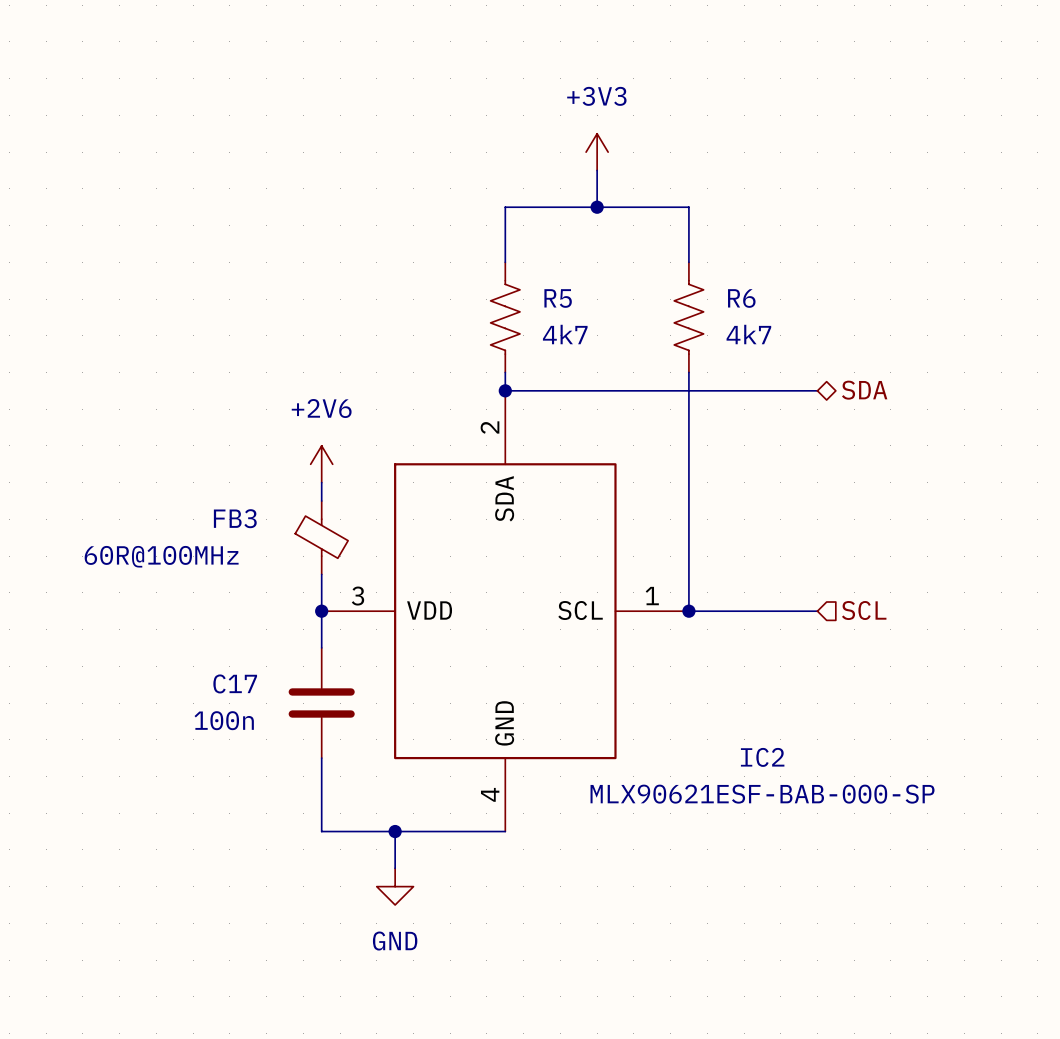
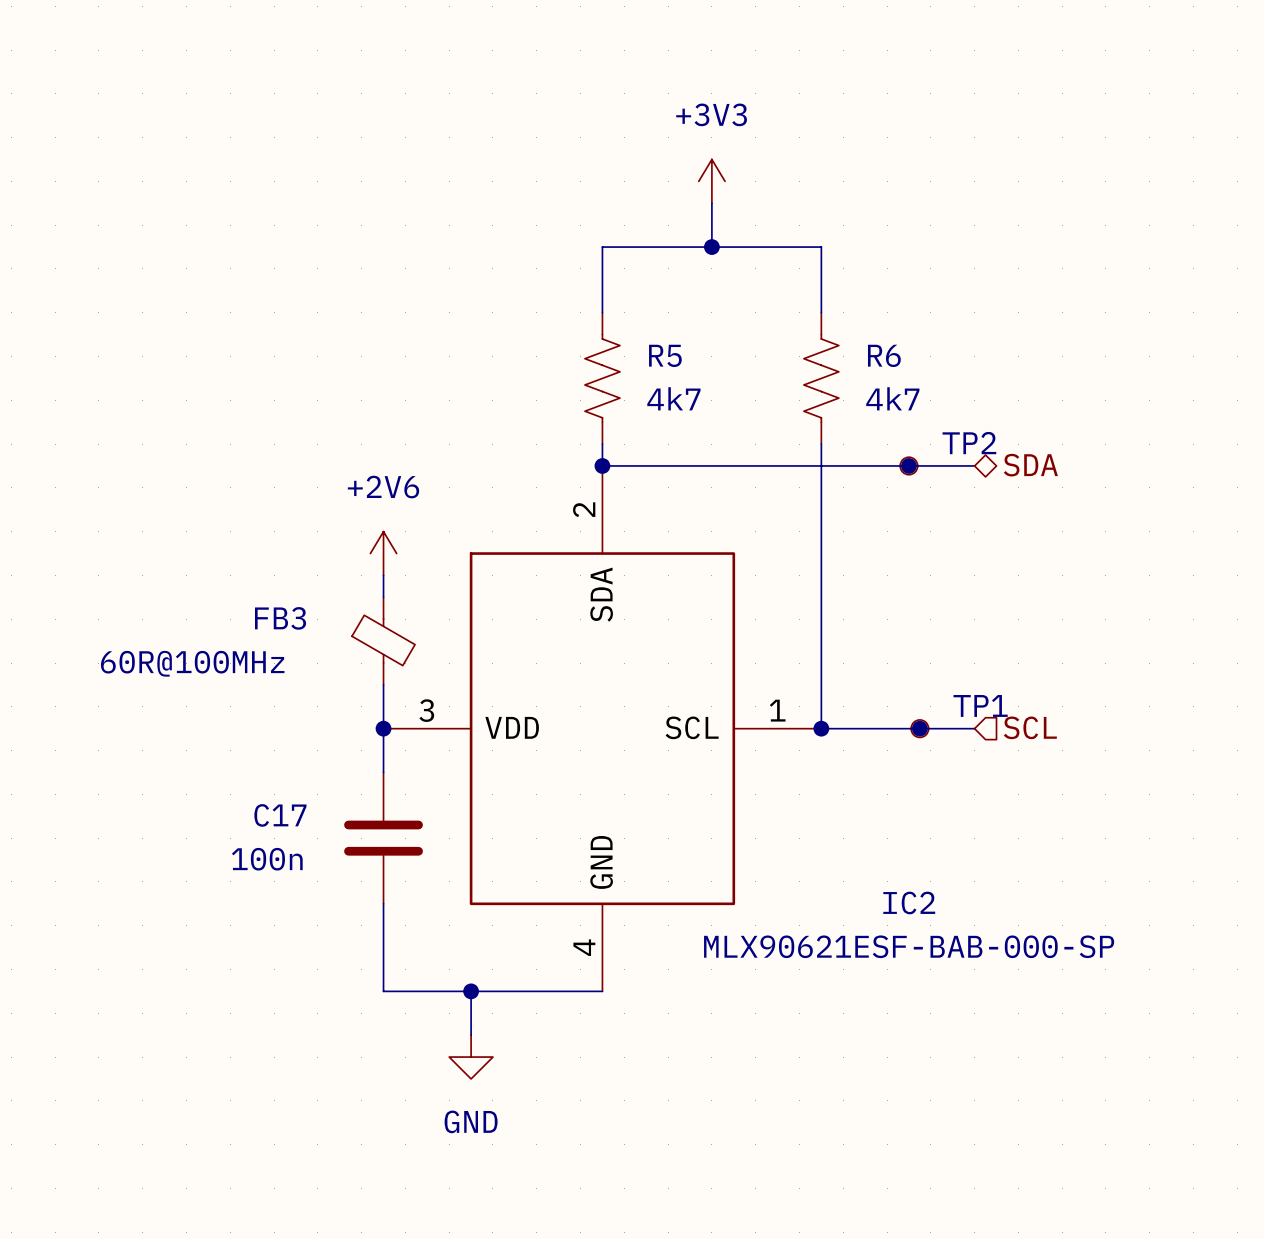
junction: none -> (908, 465)
TP2: none -> (908, 465)
junction: none -> (919, 728)
TP1: none -> (919, 728)

